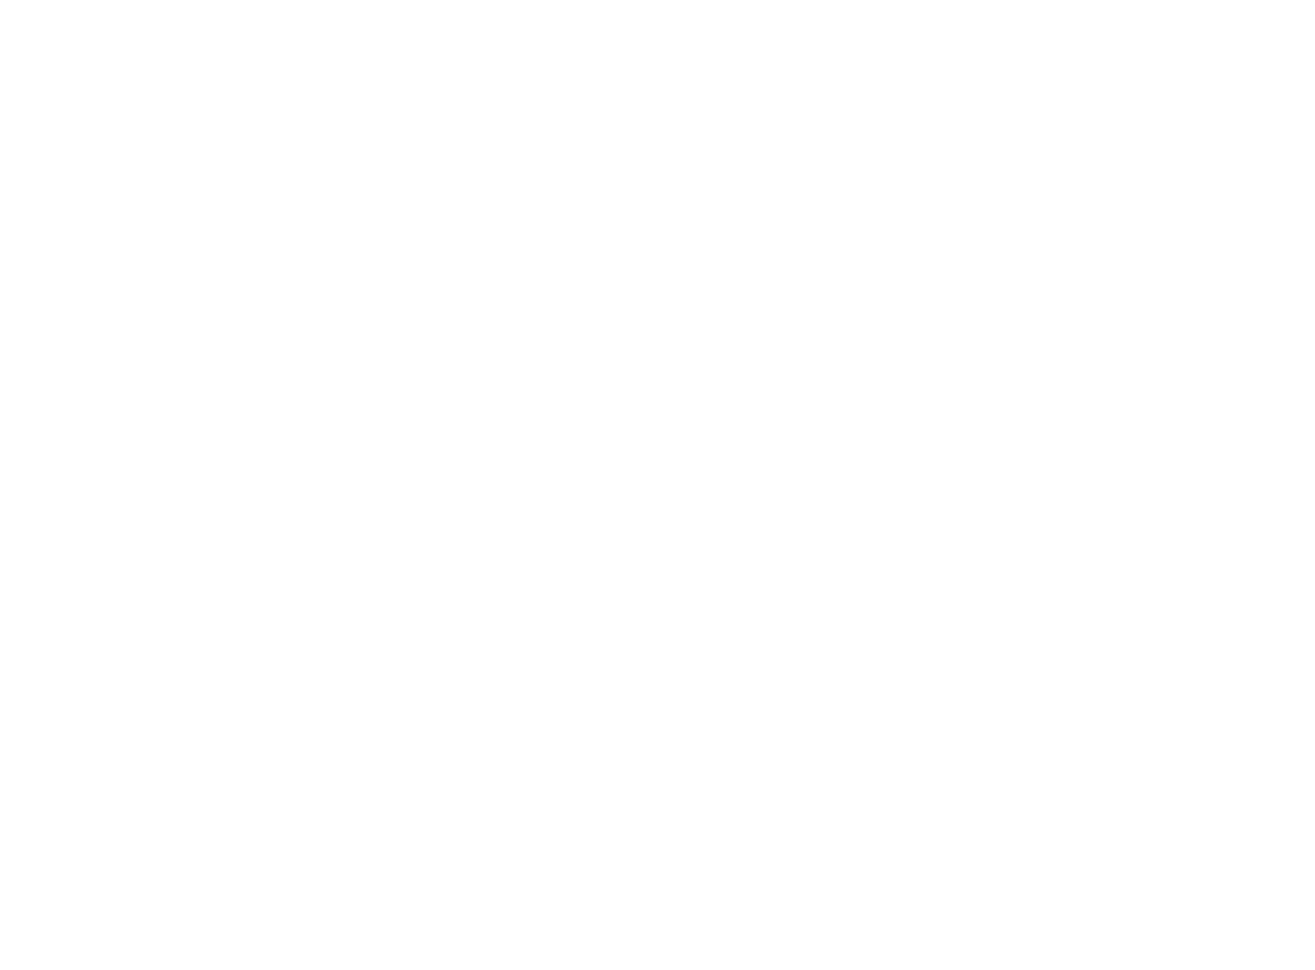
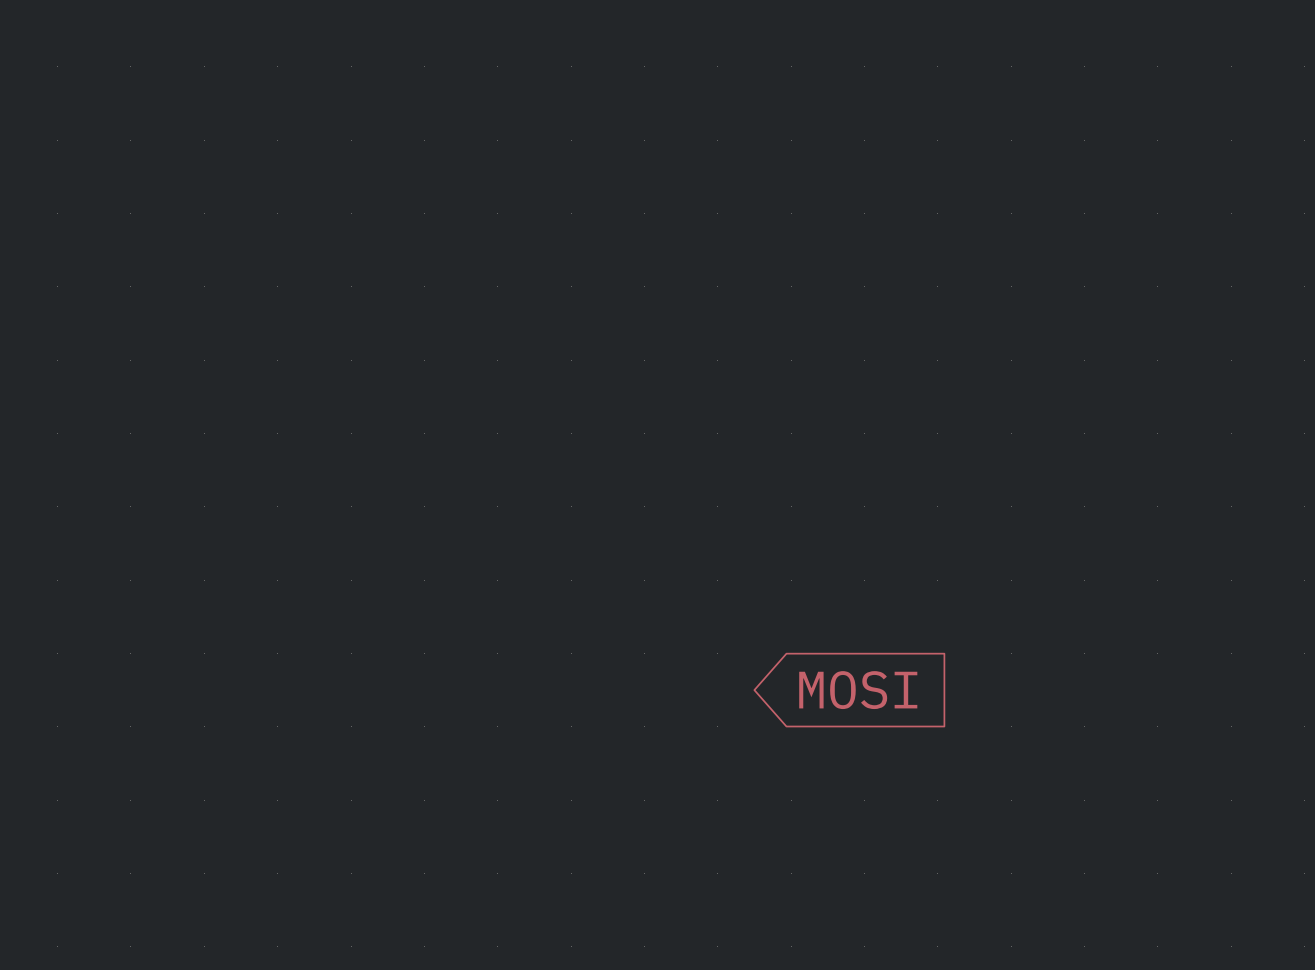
global label: none -> MOSI (858, 690)

